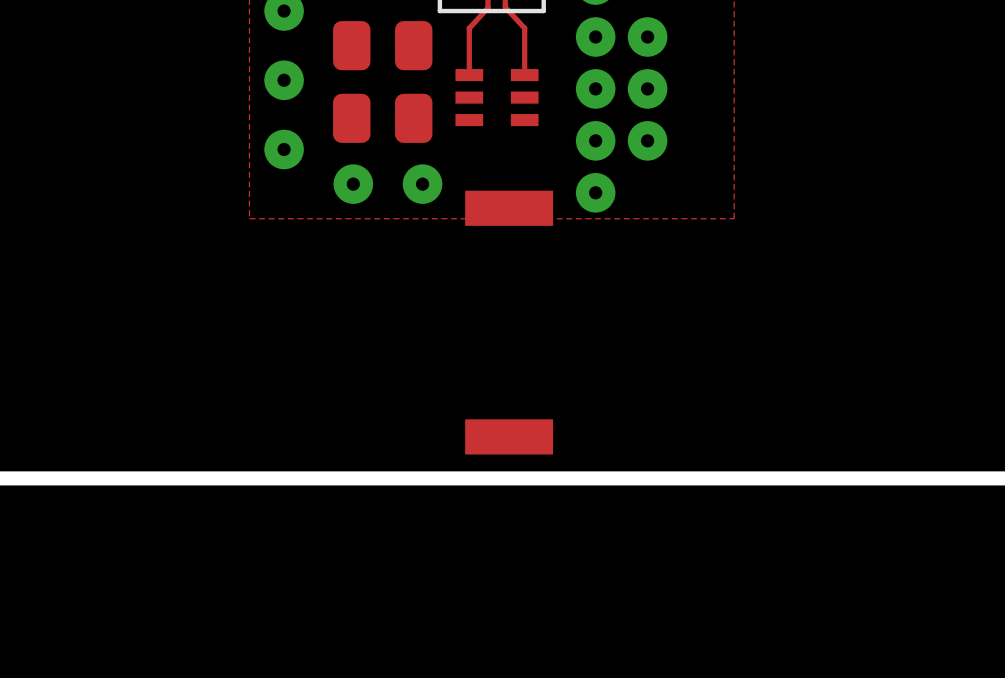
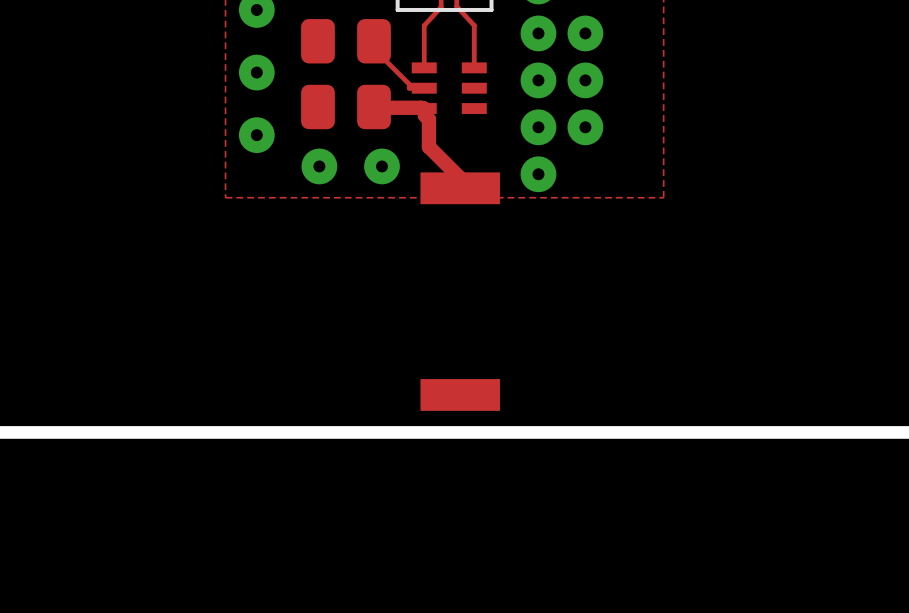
top track: none -> (374, 41) (374, 49) (409, 84) (409, 88) (424, 88)
top track: none -> (374, 106) (424, 108) (425, 115) (428, 119) (428, 146) (460, 178) (460, 188)

